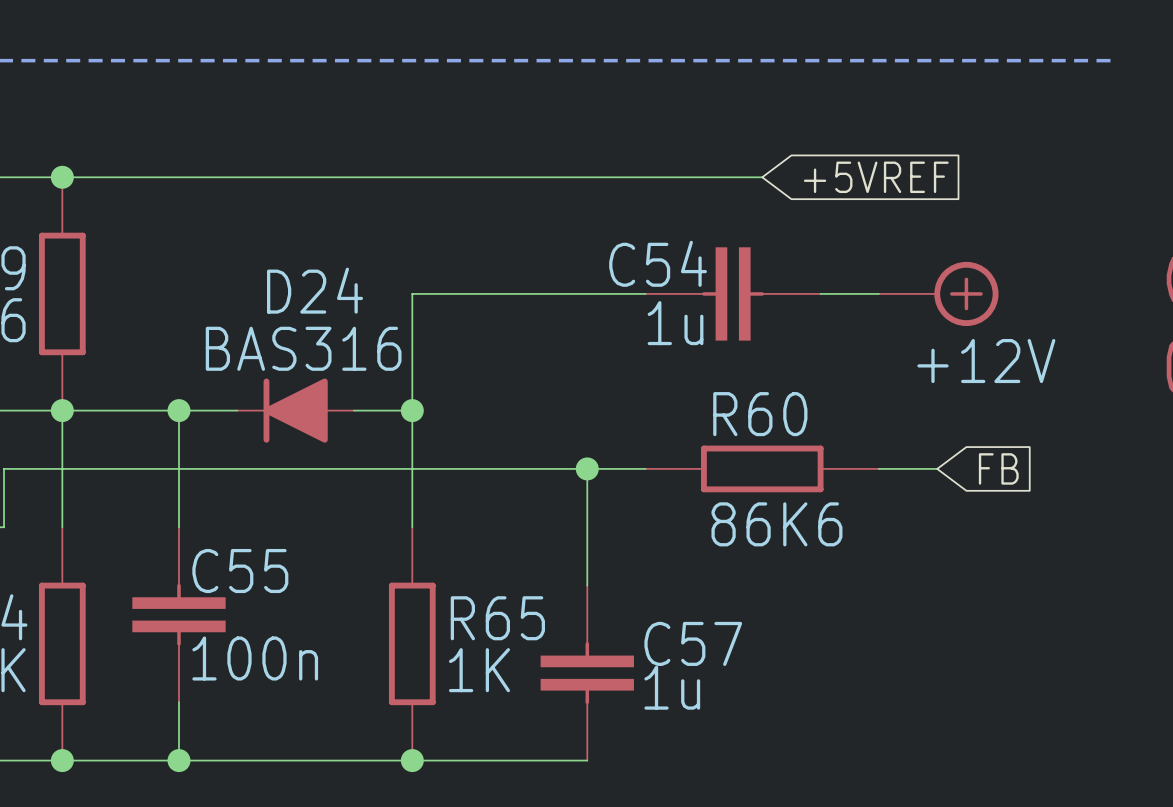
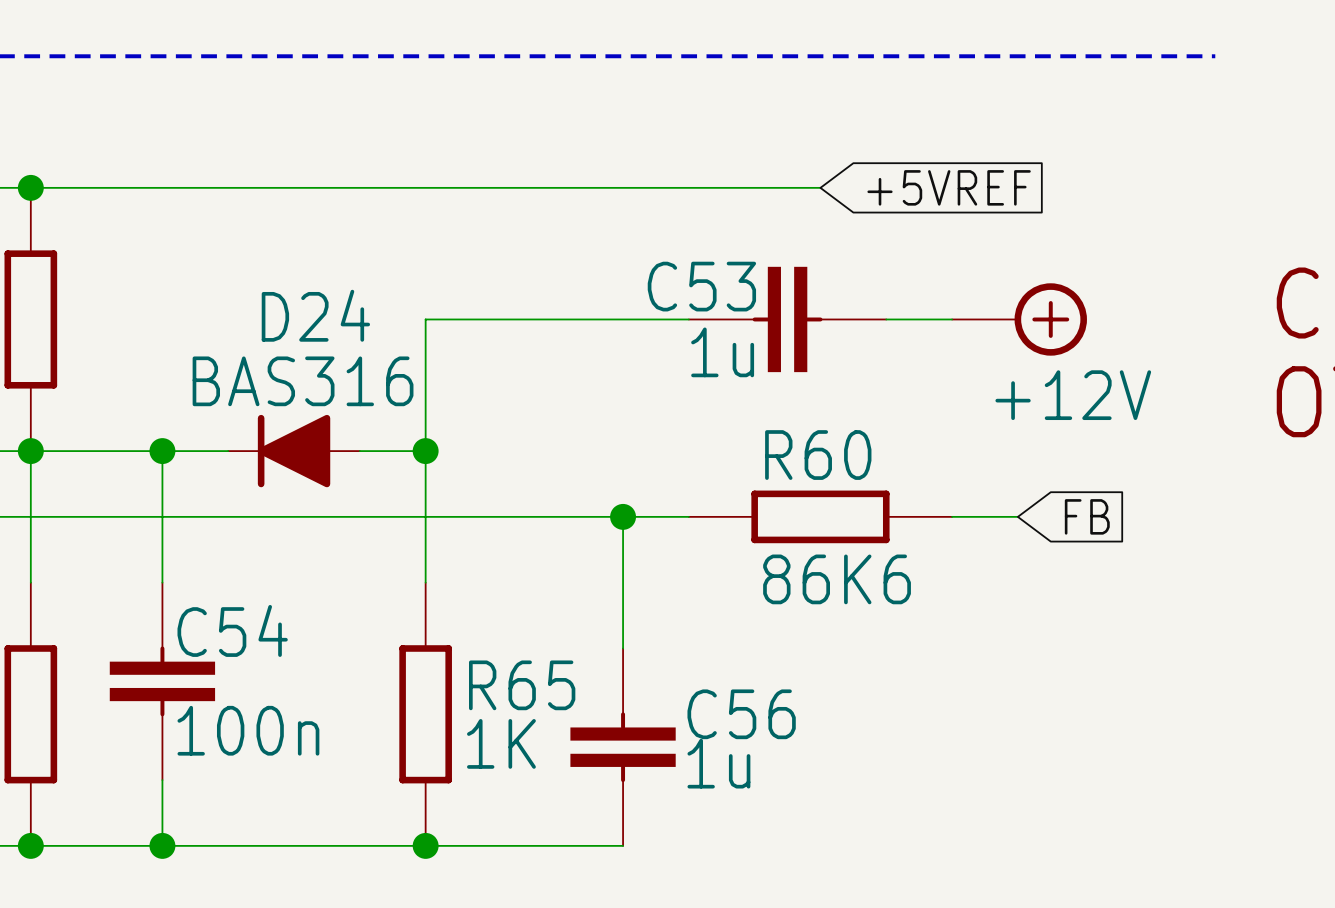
C54 name: C54 (658, 263) -> C53 (701, 286)
C55 name: C55 (240, 571) -> C54 (232, 630)
C57 name: C57 (693, 643) -> C56 (741, 714)

